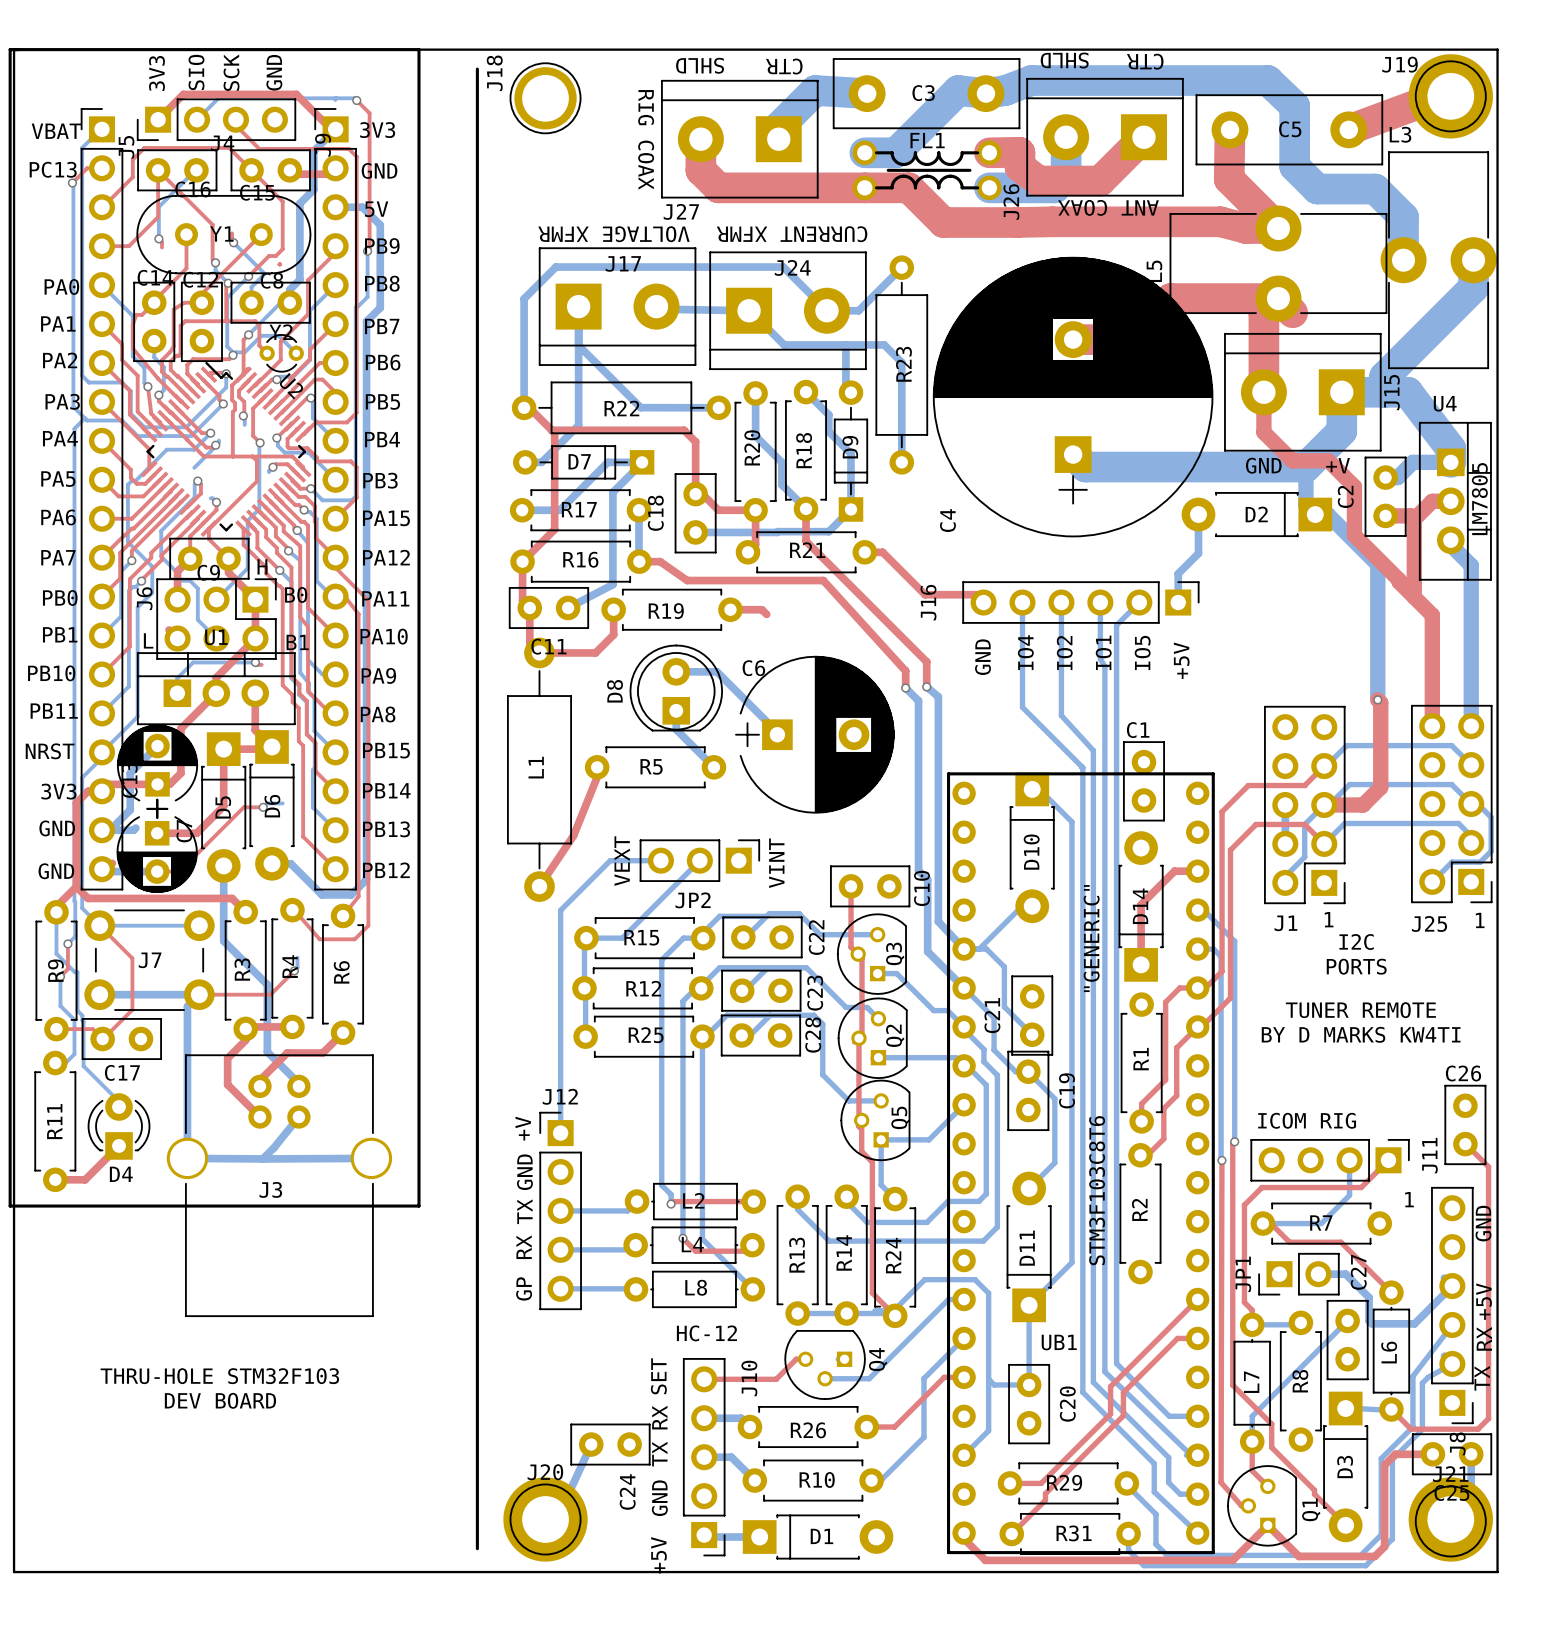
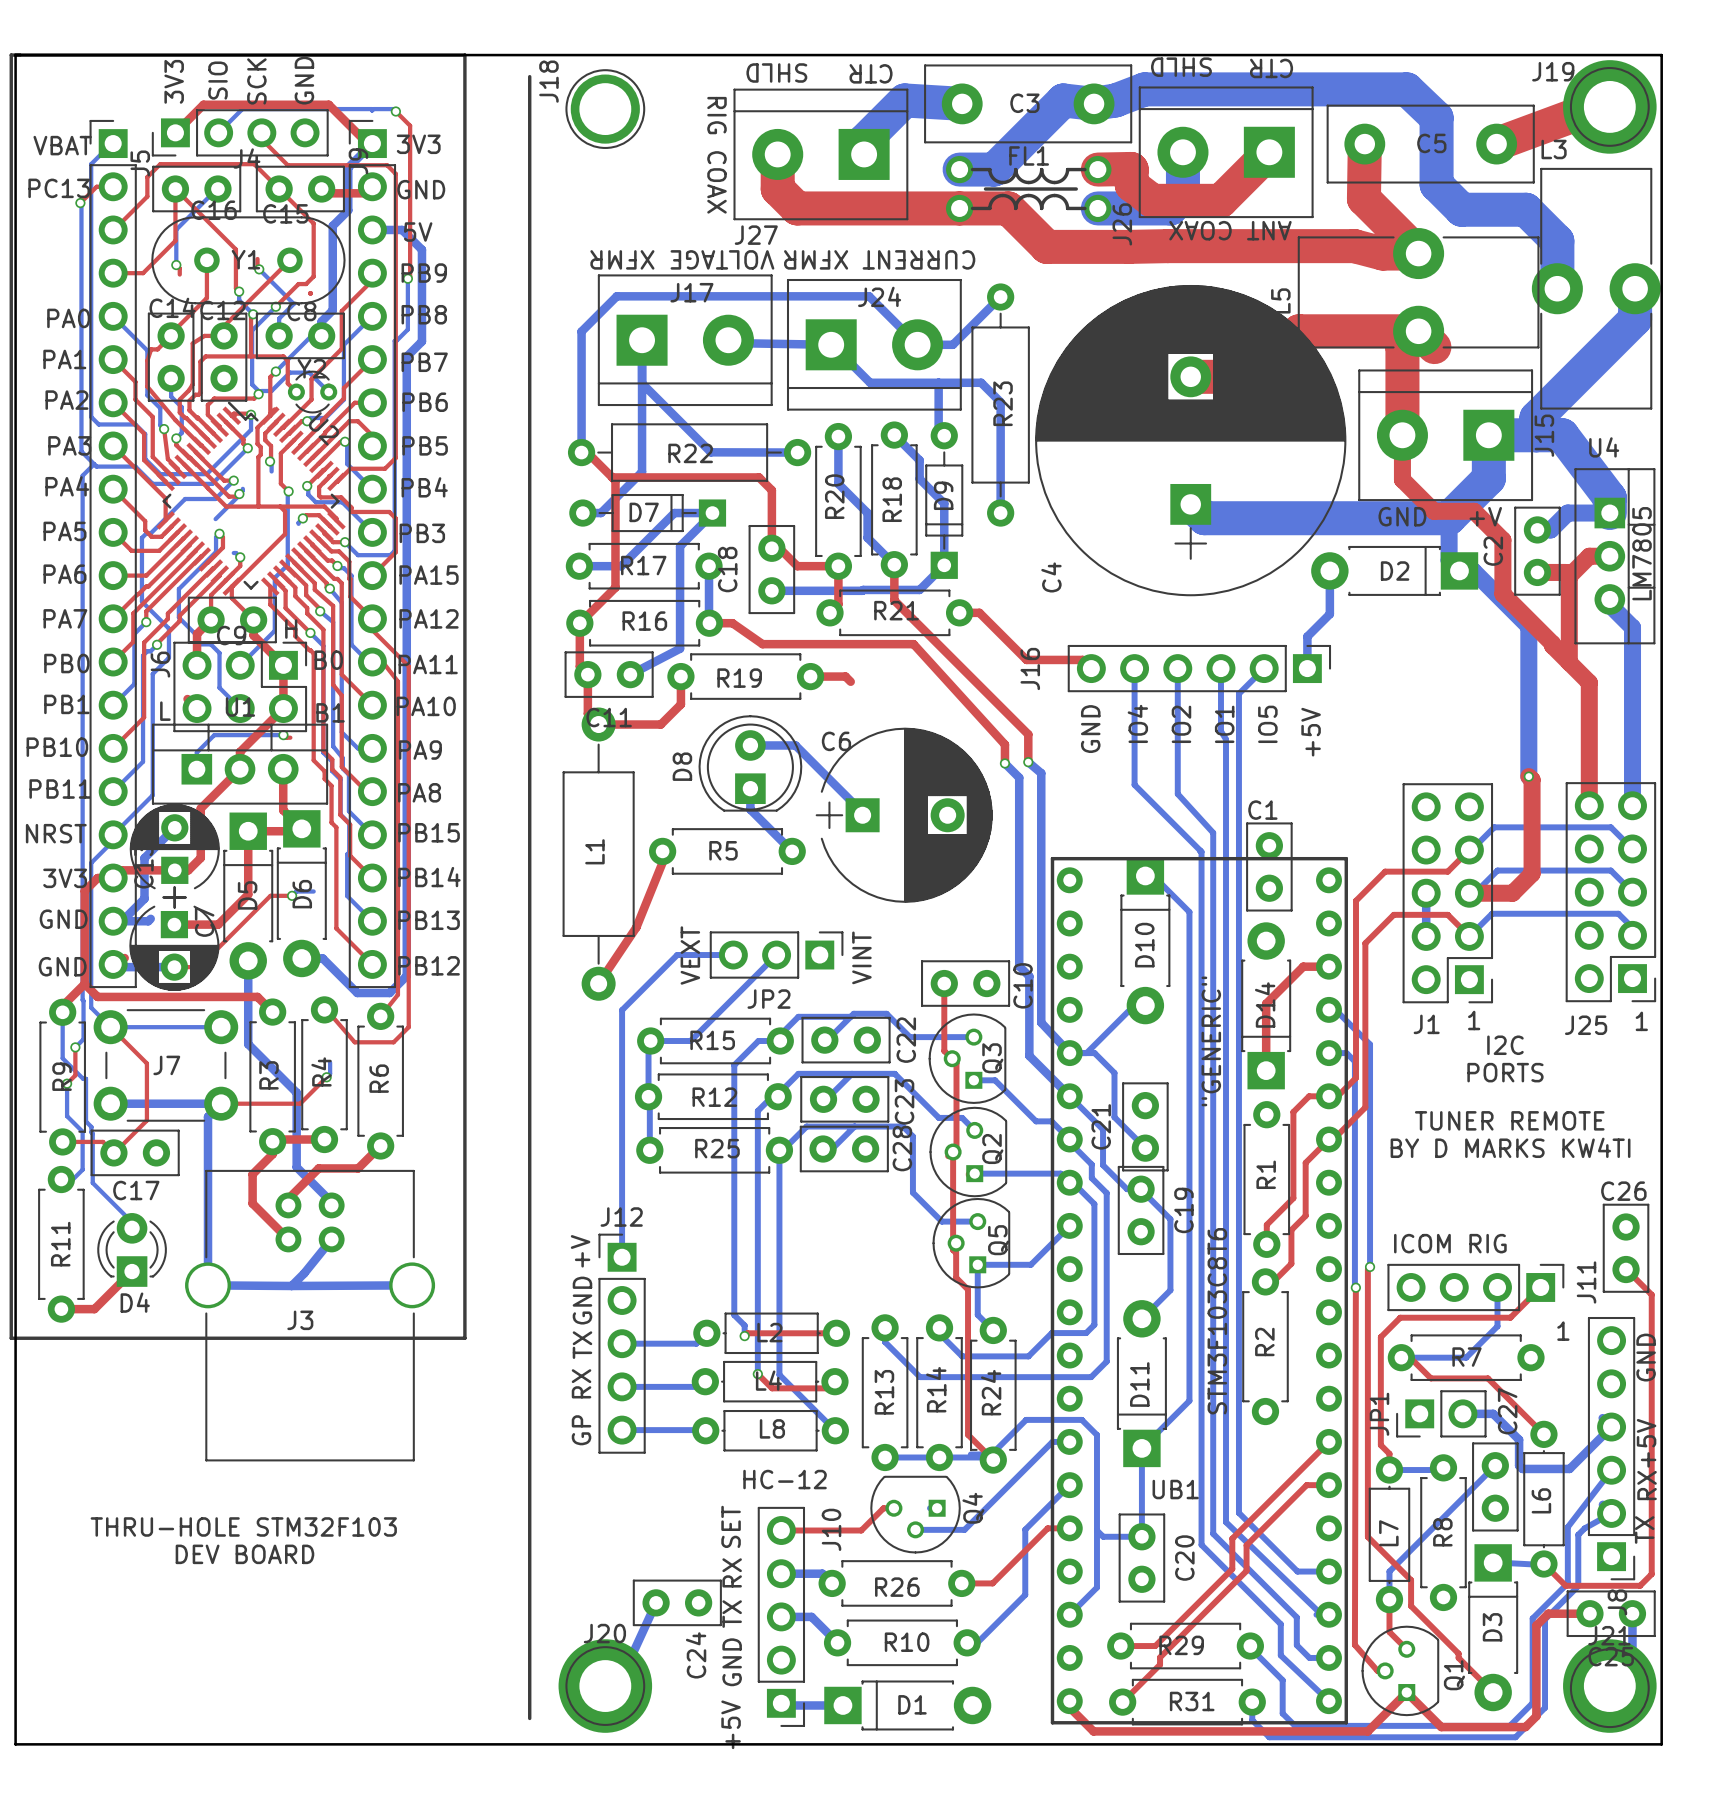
bottom track: (1471, 804) (1477, 804) (1491, 817) (1491, 851) (1480, 862) (1452, 862) (1432, 881) -> none
bottom track: (1324, 805) (1304, 824) (1304, 857) (1285, 876) (1285, 882) -> none

